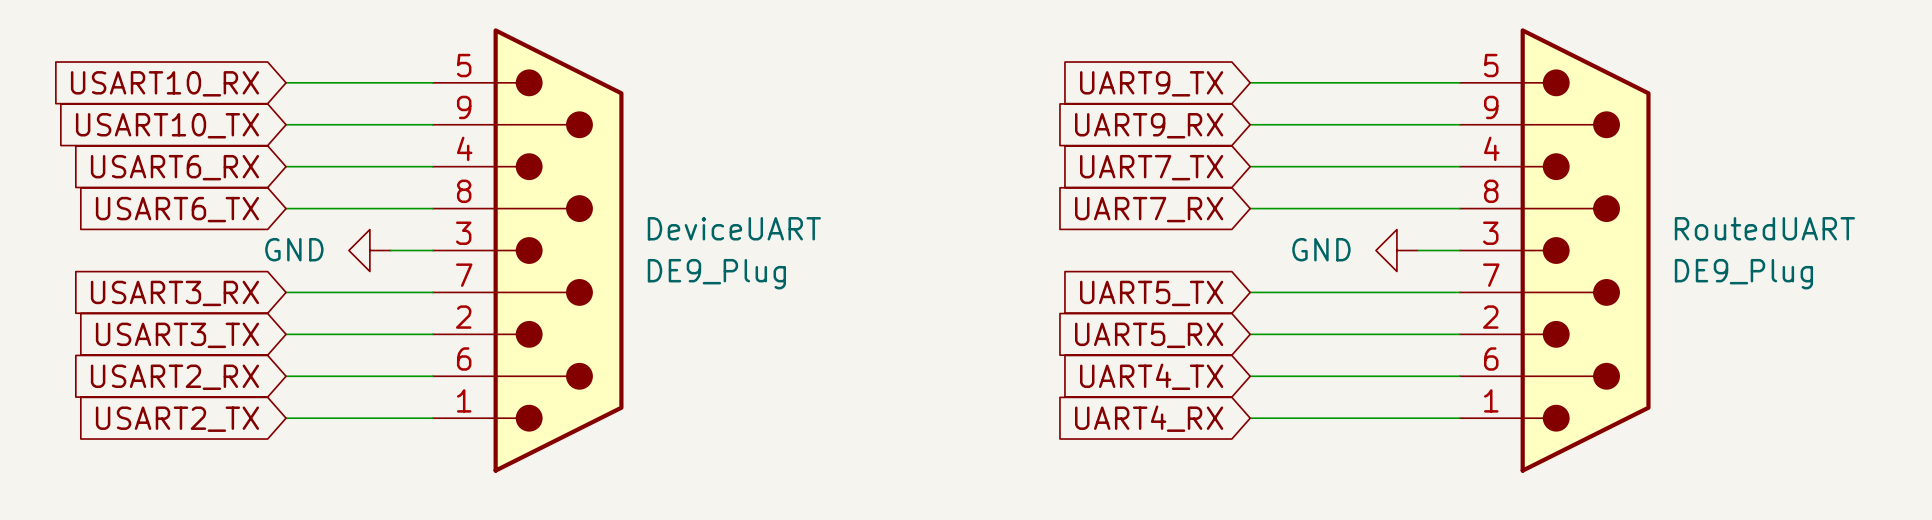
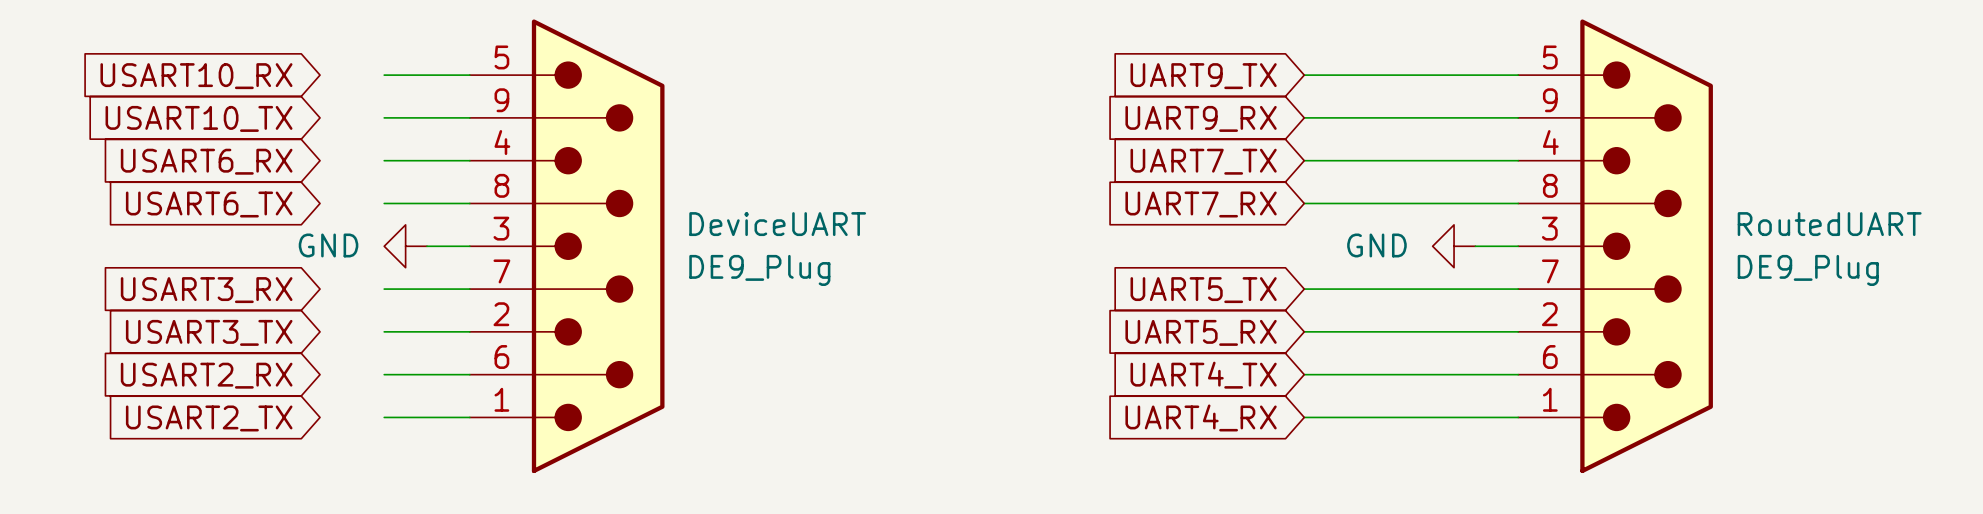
wire: (286, 82) (348, 82) -> none
wire: (286, 124) (348, 124) -> none
wire: (286, 166) (348, 166) -> none
wire: (286, 208) (348, 208) -> none
wire: (286, 292) (348, 292) -> none
wire: (286, 334) (348, 334) -> none
wire: (286, 376) (348, 376) -> none
wire: (286, 418) (348, 418) -> none

